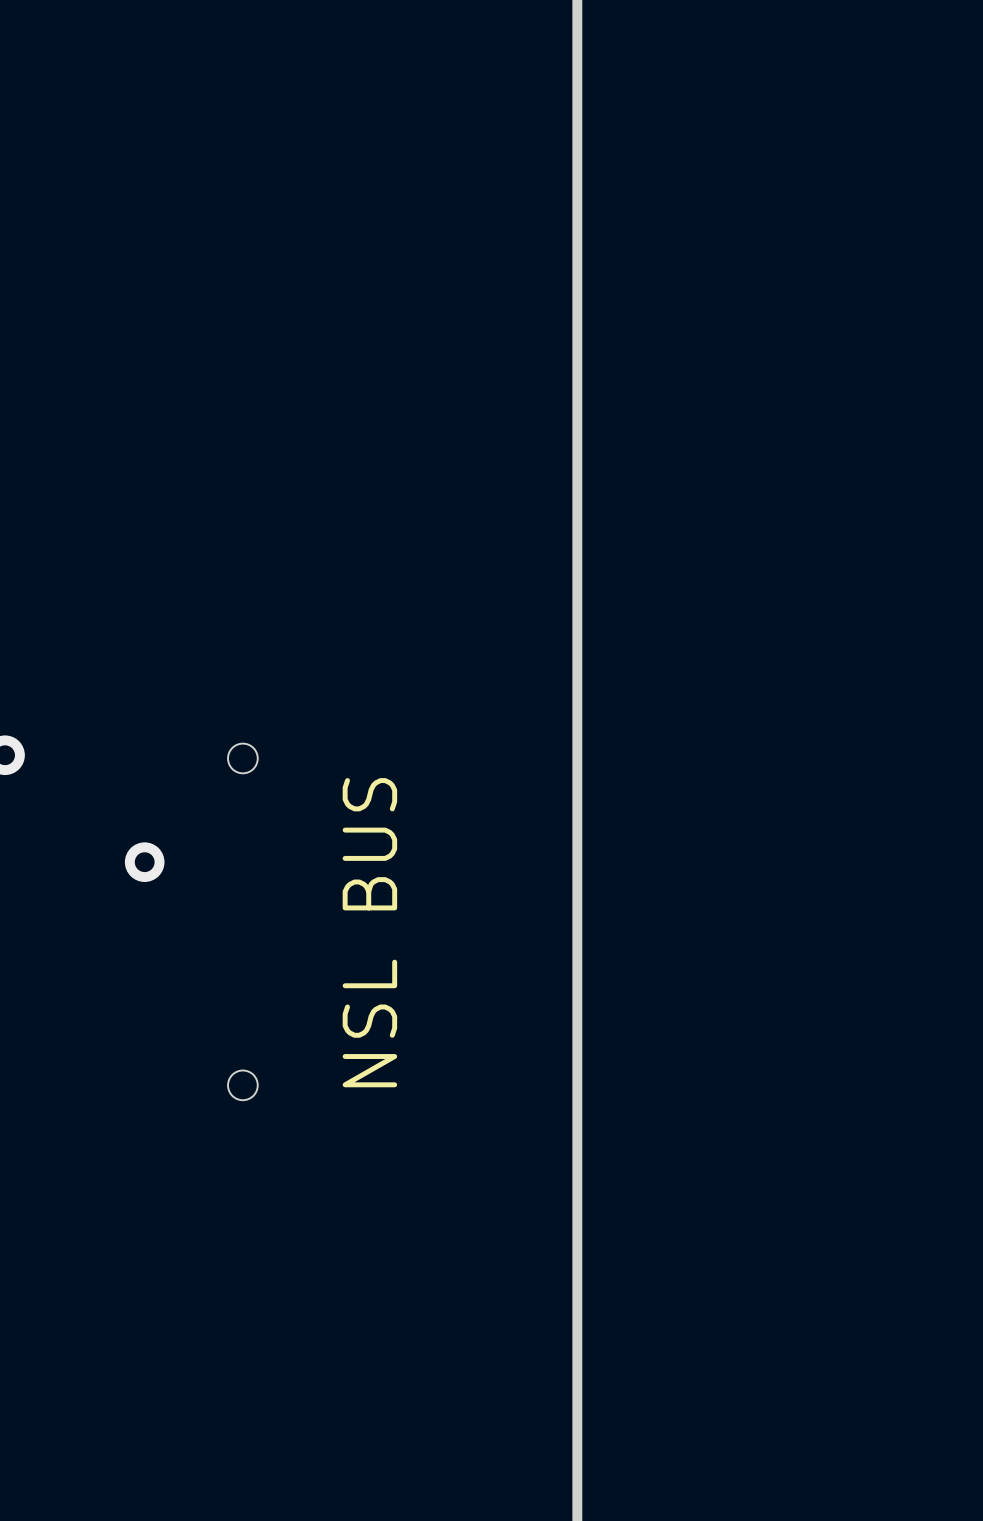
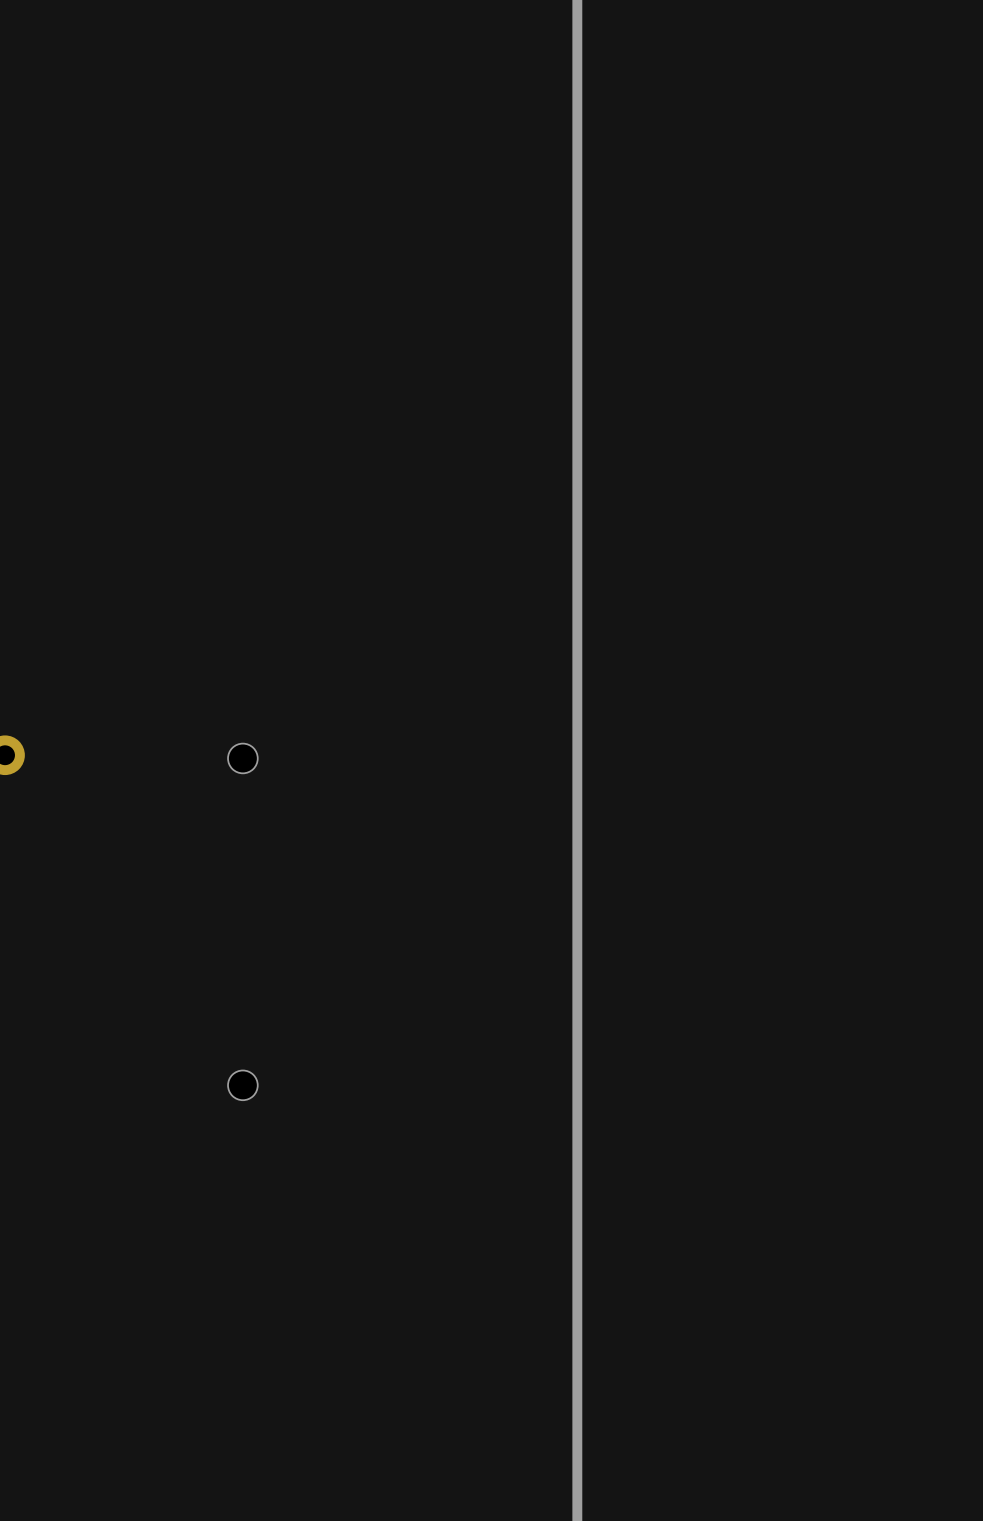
via: (144, 862) -> none
text: NSL BUS (369, 932) -> none

